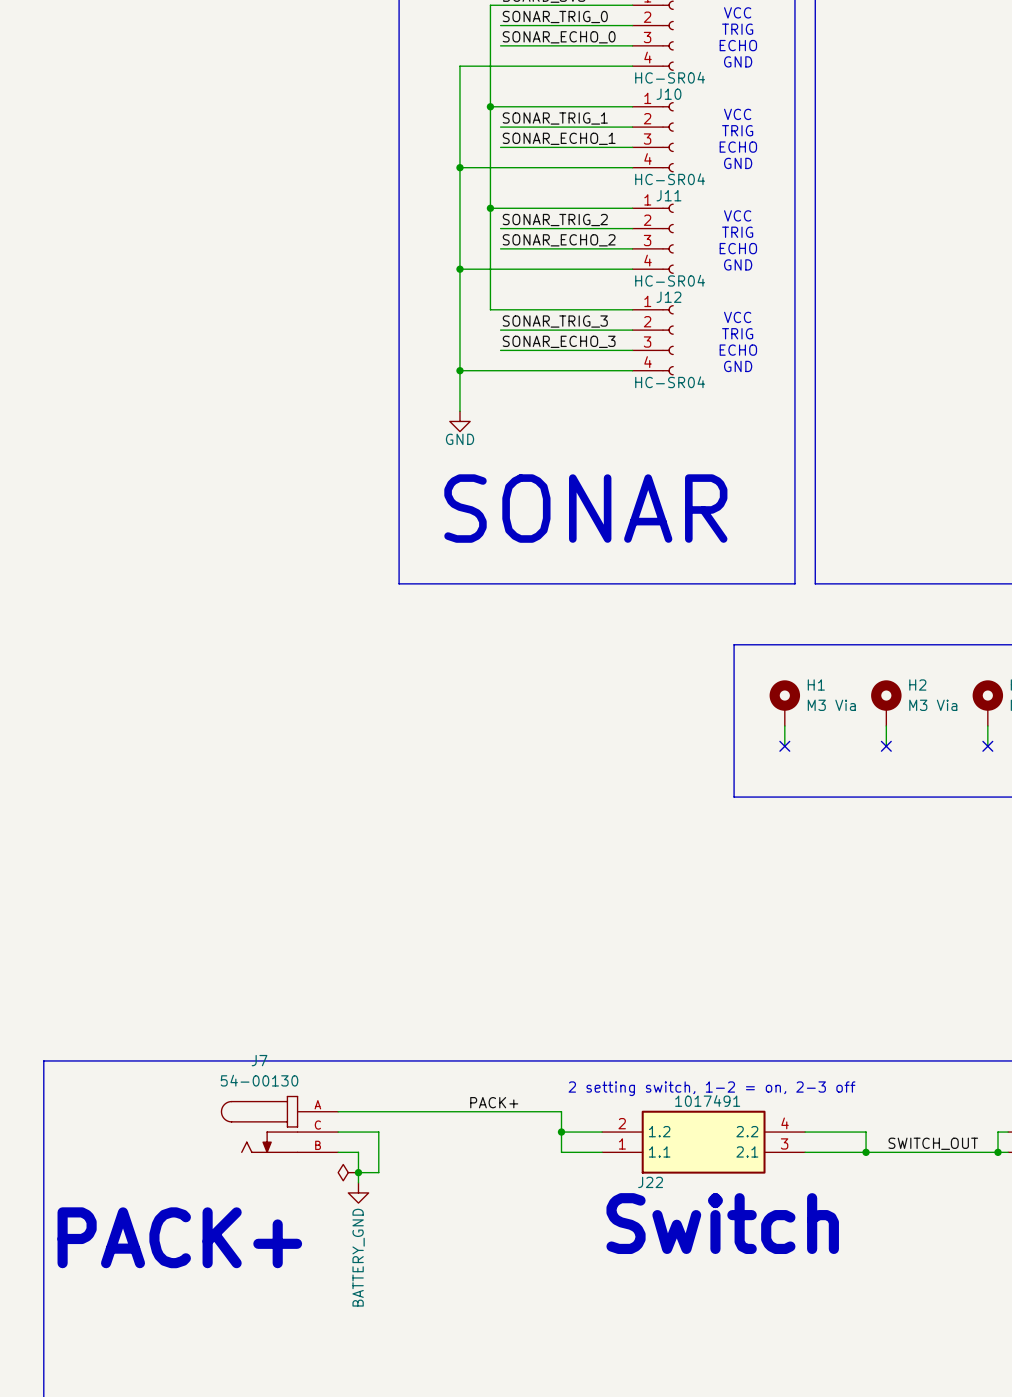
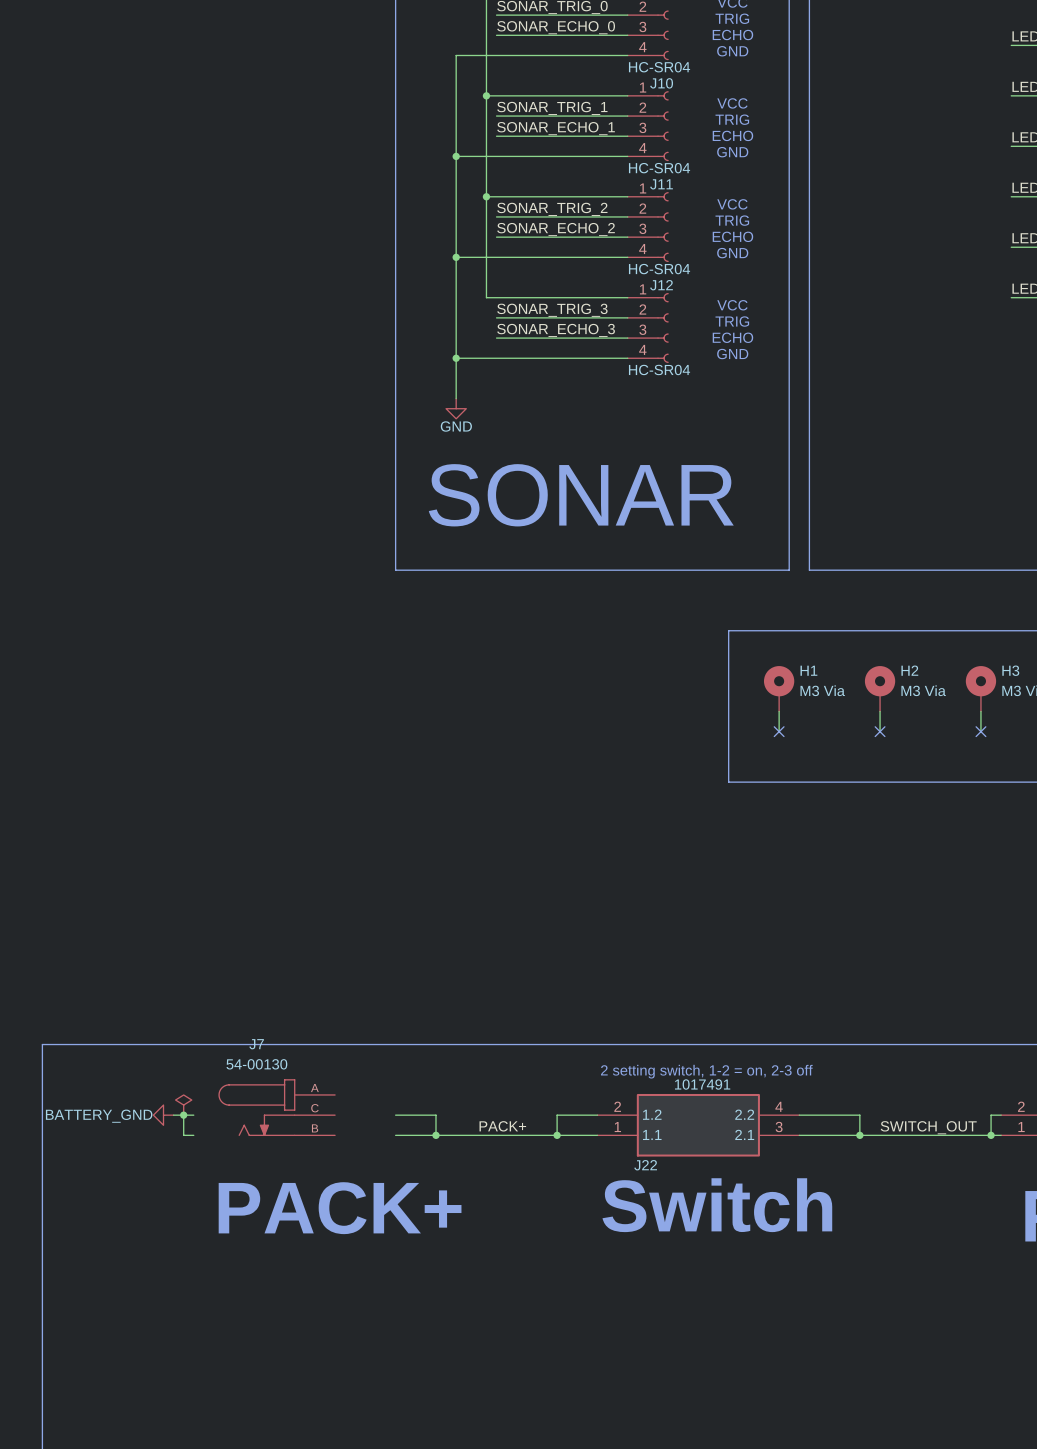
label position: PACK+ (494, 1102) -> PACK+ (502, 1126)
wire: (338, 1111) (561, 1111) (561, 1132) -> none
power symbol: none -> BATTERY_GND (163, 1115)
wire: none -> (173, 1115) (193, 1115)
wire: none -> (183, 1115) (183, 1135) (193, 1135)
junction: none -> (183, 1115)
wire: (338, 1132) (378, 1132) (378, 1172) (358, 1172) -> none
wire: none -> (395, 1115) (435, 1115) (435, 1135)
junction position: (561, 1132) -> (557, 1135)
wire: (338, 1152) (358, 1152) (358, 1182) -> none
wire: none -> (395, 1135) (557, 1135)
junction: none -> (435, 1135)
power symbol rotation: 0° (348, 1172) -> 90° clockwise (183, 1105)
power symbol position: (348, 1172) -> (183, 1105)
junction: (358, 1172) -> none
power symbol: BATTERY_GND (358, 1192) -> none
text position: PACK+ (179, 1237) -> PACK+ (340, 1208)

